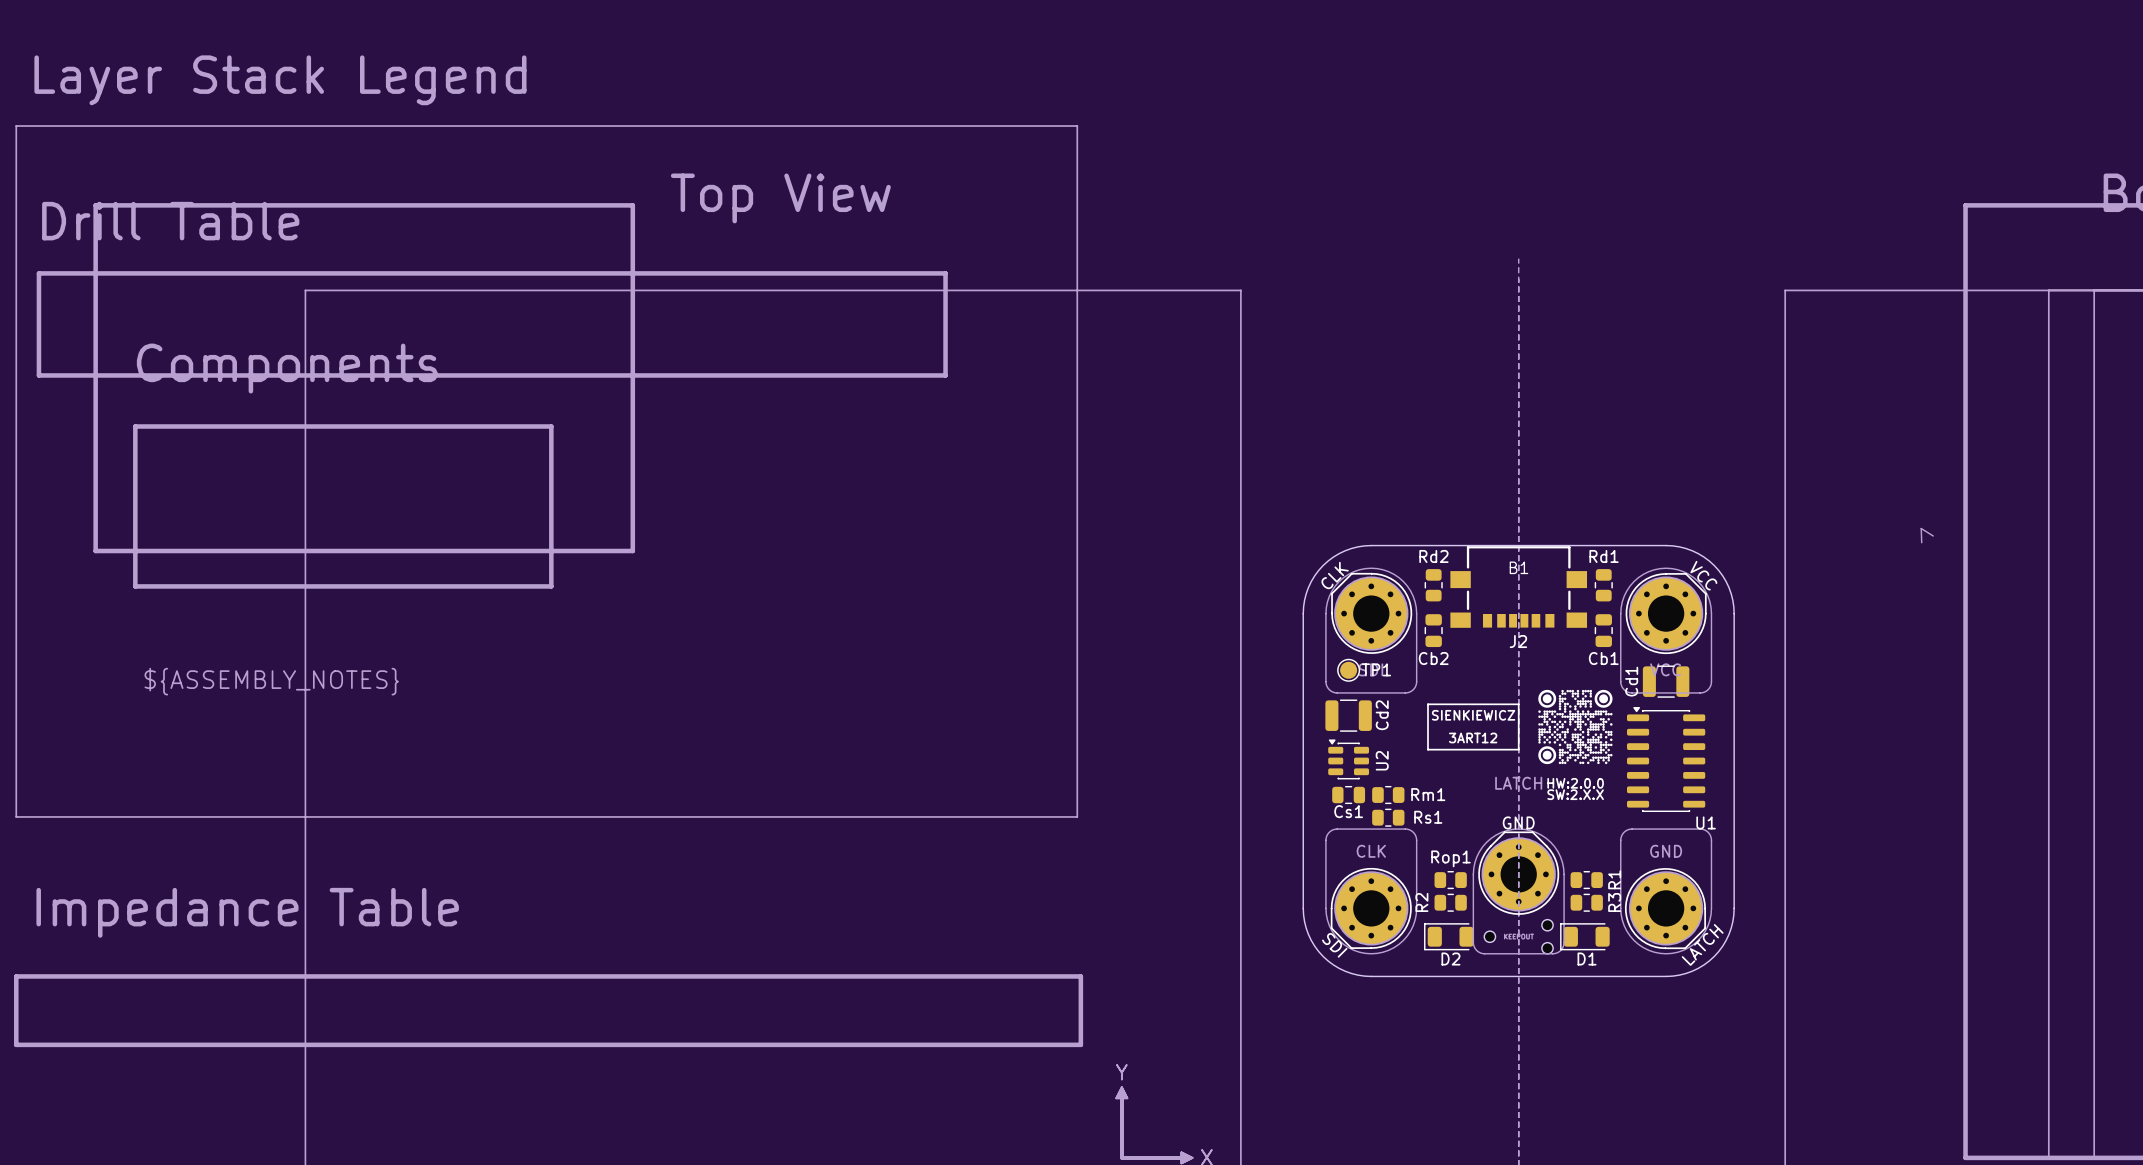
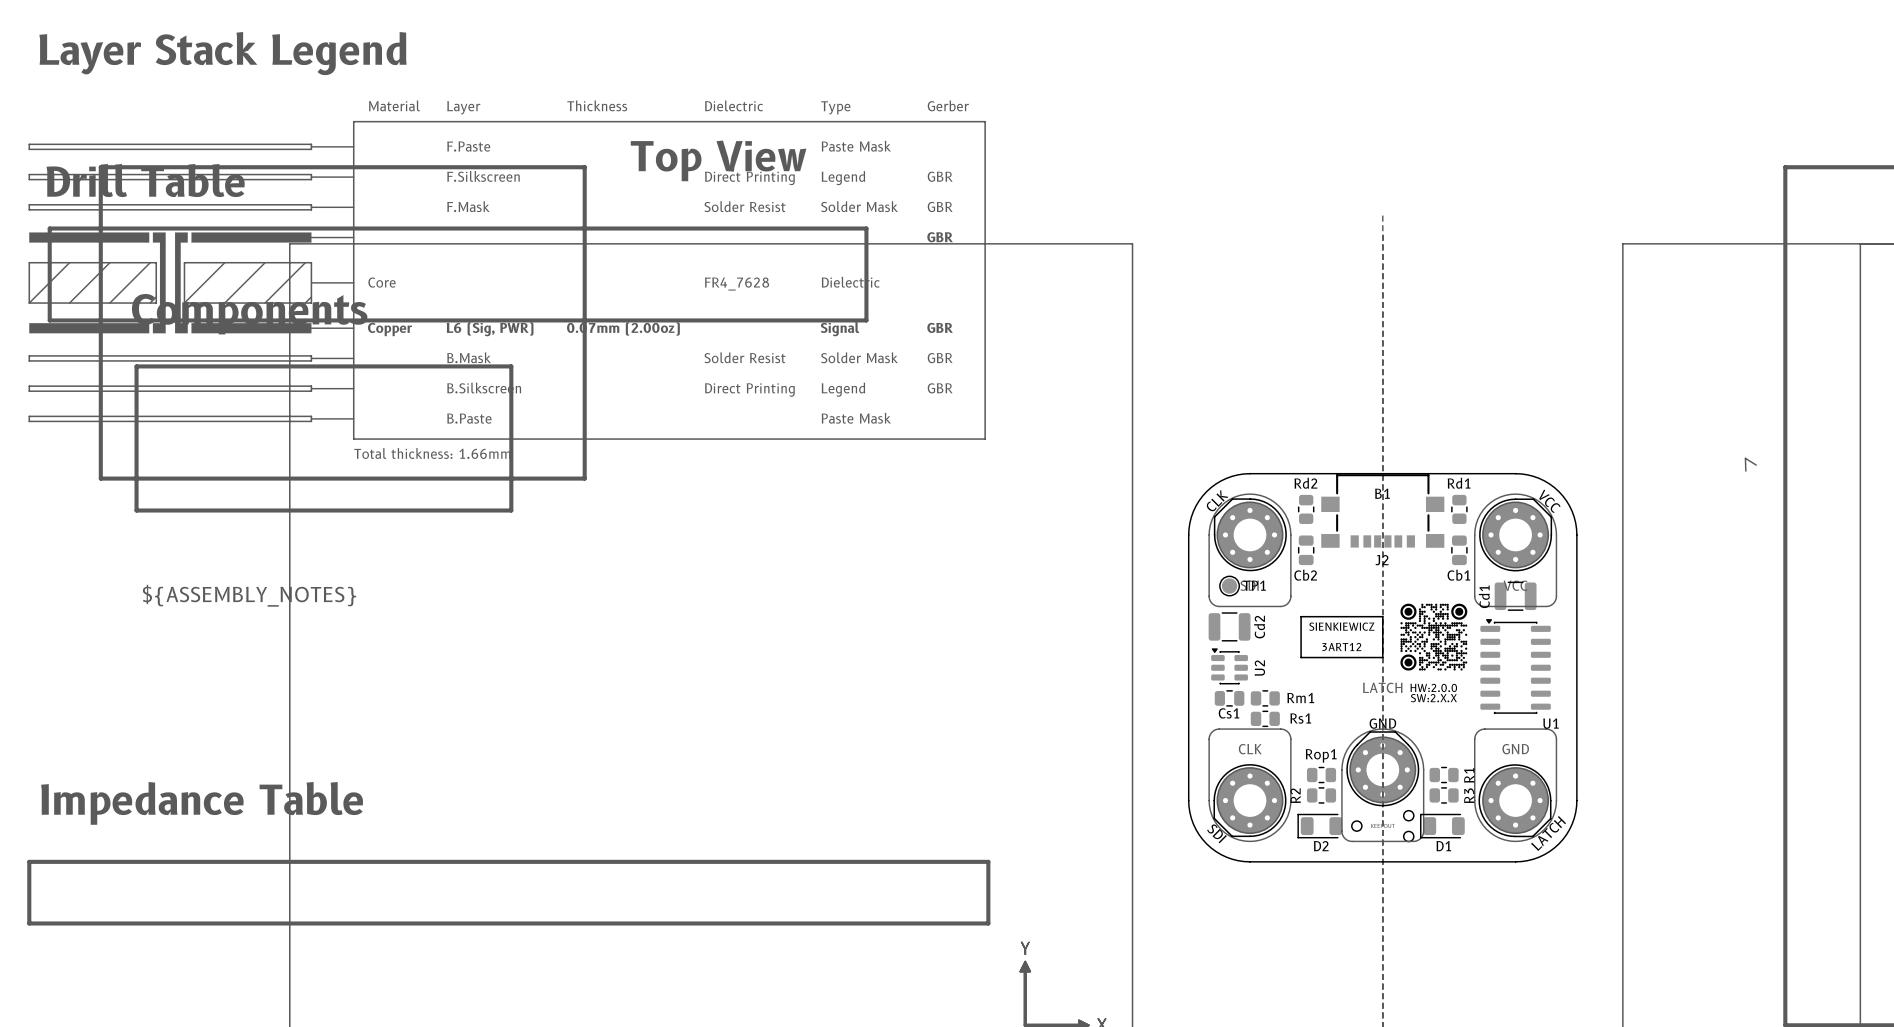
text: none -> Material (394, 105)
text: none -> Thickness (597, 105)
text: none -> Dielectric (733, 105)
text: none -> Gerber (948, 105)
text: none -> Layer (463, 107)
text: none -> Type (835, 107)
line: (1077, 154) (1077, 126) (16, 126) (16, 179) -> (985, 121) (353, 121) (353, 439) (985, 439)
line: none -> (311, 146) (353, 146)
text: none -> F.Paste (468, 146)
text: none -> Paste Mask (856, 146)
line: (16, 185) (16, 213) -> (29, 149) (311, 149) (311, 144) (29, 144)
text: none -> F.Silkscreen (483, 176)
text: none -> GBR (940, 176)
line: none -> (311, 177) (353, 177)
text: none -> Direct Printing (749, 178)
text: none -> Legend (843, 178)
line: (16, 219) (16, 247) -> (29, 179) (311, 179) (311, 174) (29, 174)
line: none -> (311, 207) (353, 207)
text: none -> F.Mask (468, 206)
text: none -> Solder Resist (745, 206)
text: none -> Solder Mask (859, 206)
text: none -> GBR (940, 207)
line: (16, 252) (16, 311) -> (29, 209) (311, 209) (311, 204) (29, 204)
drawing: none -> [29, 232, 312, 334]
line: none -> (311, 237) (353, 237)
text: none -> GBR (940, 237)
line: none -> (29, 262) (156, 262) (156, 303) (29, 303) (69, 262)
line: none -> (109, 262) (69, 303)
line: none -> (150, 262) (109, 303)
line: none -> (224, 262) (184, 303)
line: none -> (265, 262) (224, 303)
line: none -> (305, 262) (265, 303)
line: none -> (311, 282) (353, 282)
text: none -> Core (382, 282)
text: none -> FR4_7628 (737, 284)
text: none -> Dielectric (850, 282)
line: none -> (156, 296) (150, 303)
line: none -> (311, 296) (305, 303)
line: (16, 356) (16, 414) -> none
line: none -> (184, 303) (311, 303) (311, 262) (184, 262) (184, 303)
text: none -> GBR (940, 327)
line: none -> (311, 328) (353, 328)
text: none -> Copper (390, 329)
text: none -> L6 (Sig, PWR) (490, 329)
text: none -> 0.07mm (2.00oz) (623, 328)
text: none -> Signal (840, 329)
line: none -> (311, 358) (353, 358)
text: none -> B.Mask (469, 357)
text: none -> Solder Resist (745, 357)
text: none -> Solder Mask (859, 357)
text: none -> GBR (940, 358)
line: (16, 420) (16, 448) -> (29, 360) (311, 360) (311, 355) (29, 355)
text: none -> B.Silkscreen (484, 388)
text: none -> GBR (940, 388)
line: none -> (311, 388) (353, 388)
text: none -> Direct Printing (749, 390)
text: none -> Legend (843, 389)
line: (16, 453) (16, 481) -> (29, 391) (311, 391) (311, 386) (29, 386)
line: none -> (311, 418) (353, 418)
text: none -> B.Paste (469, 418)
text: none -> Paste Mask (856, 418)
line: (16, 487) (16, 816) (1077, 816) (1077, 507) -> (29, 421) (311, 421) (311, 416) (29, 416)
text: none -> Total thickness: 1.66mm (432, 453)

